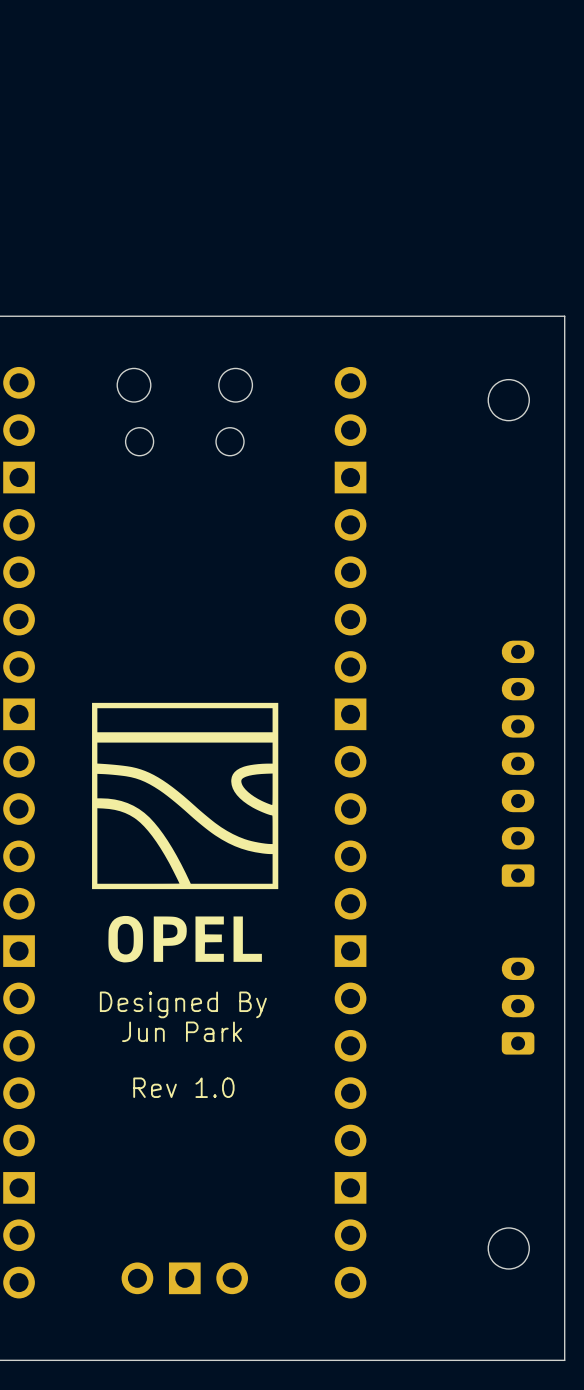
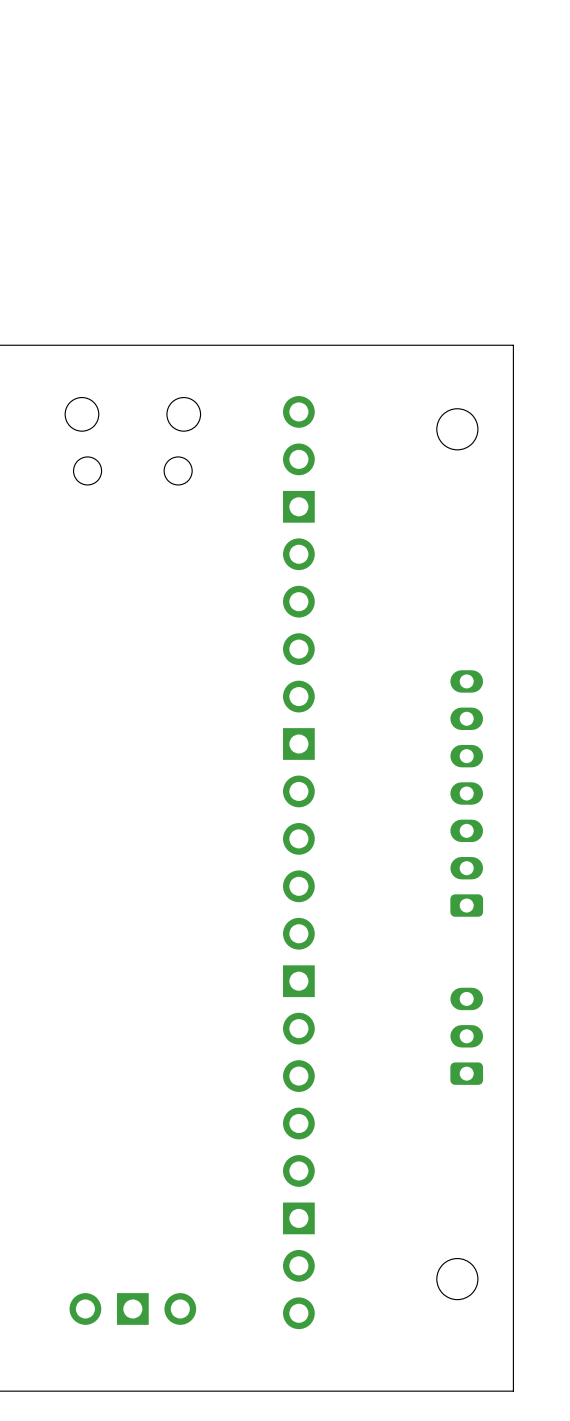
drawing: [92, 702, 279, 963] -> none
text: Designed By (183, 1004) -> none
text: Jun Park (182, 1031) -> none
text: Rev 1.0 (183, 1087) -> none

